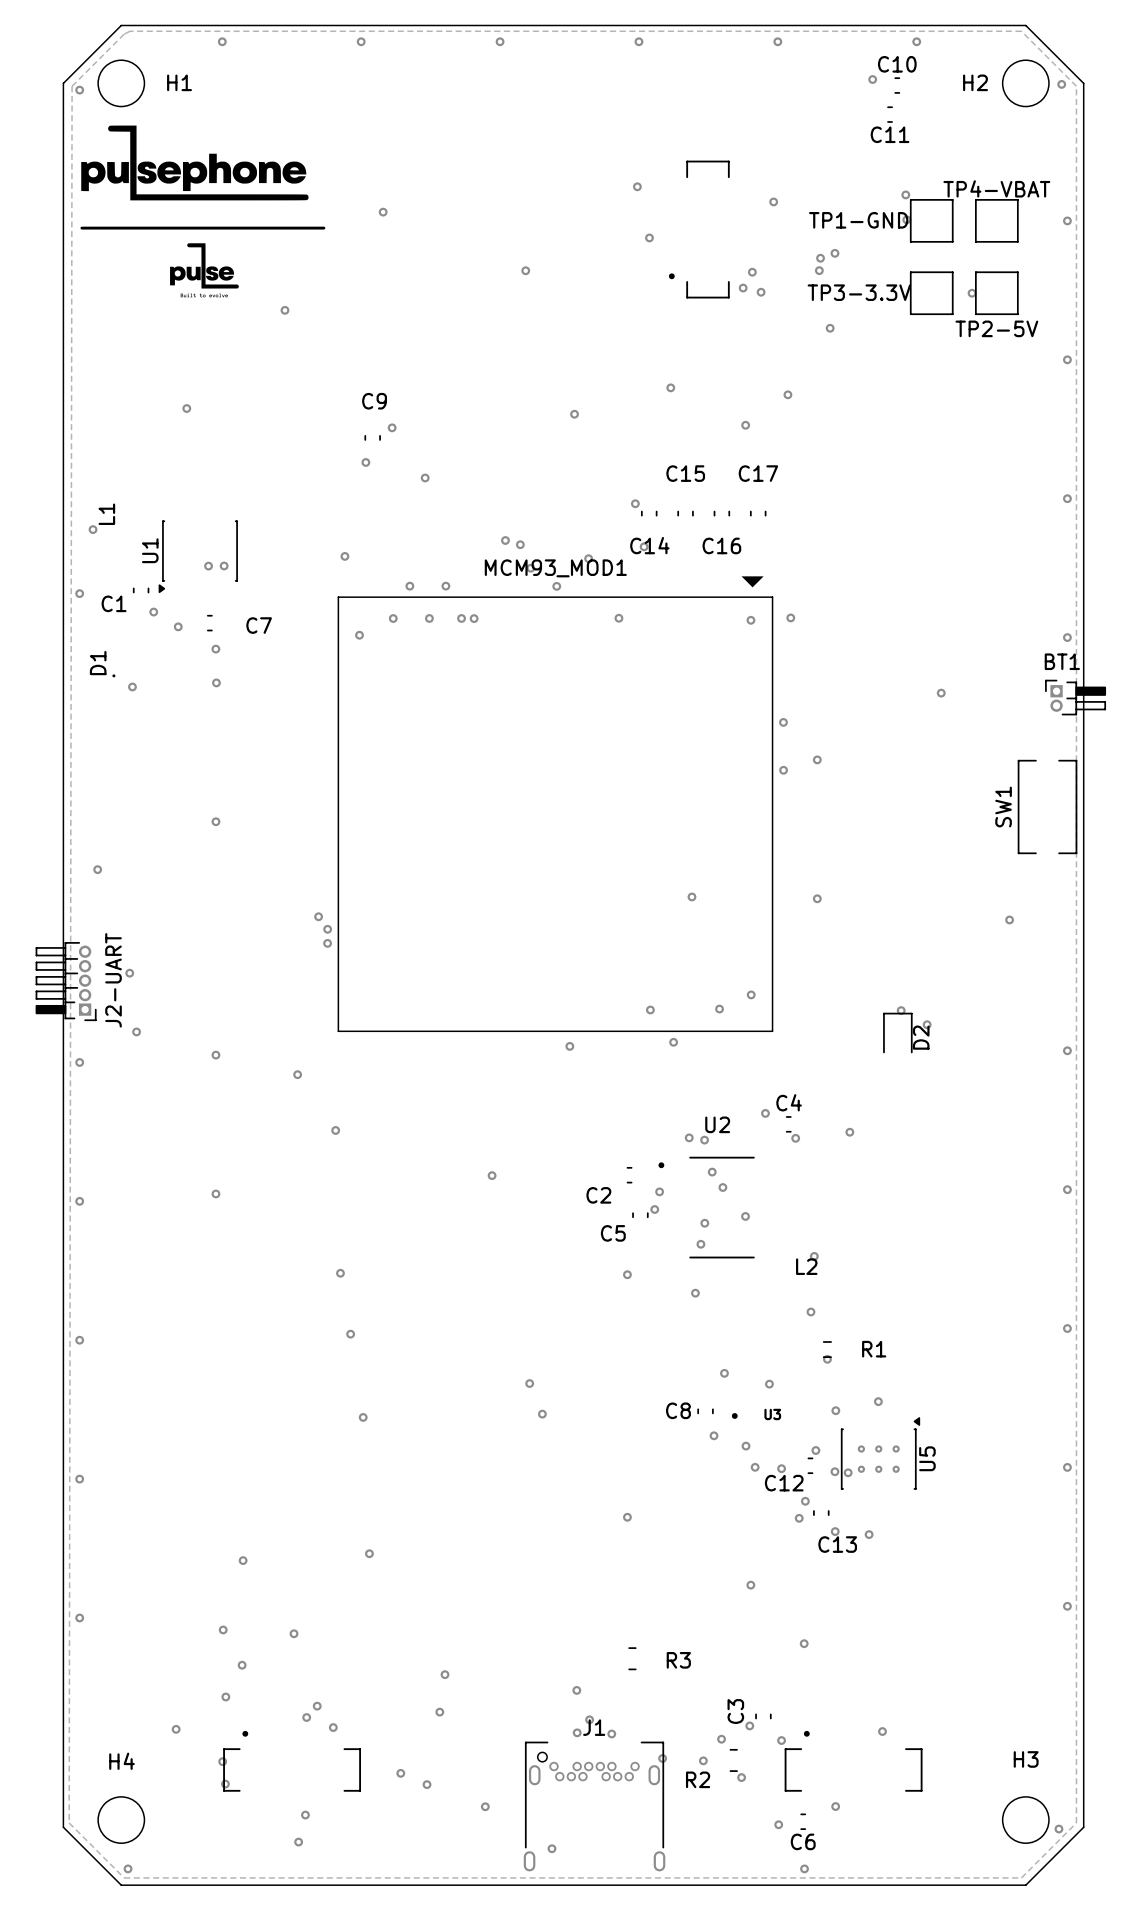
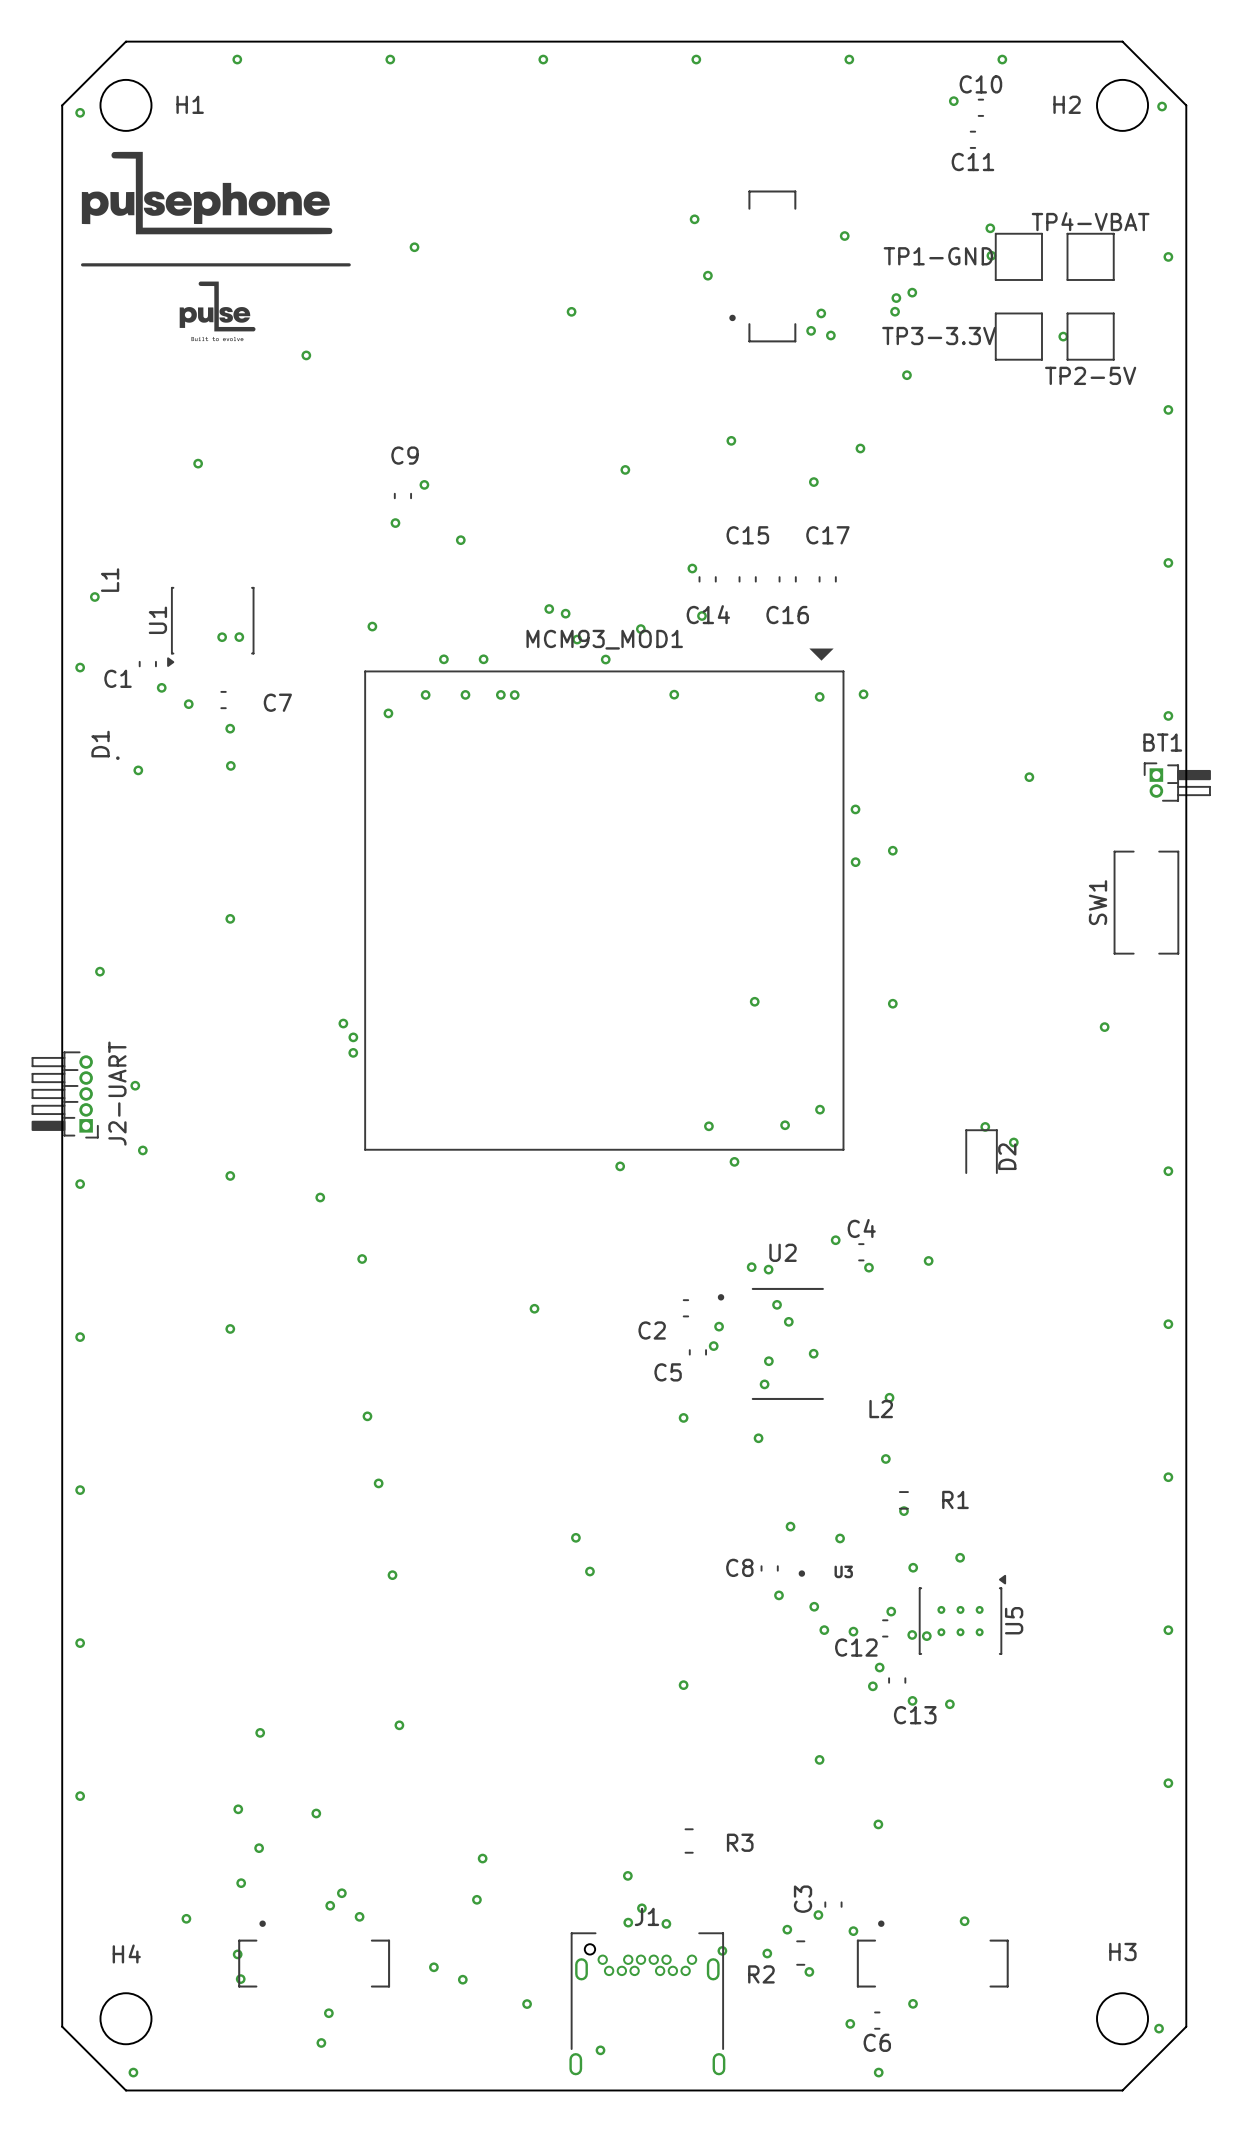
zone outline: (129, 31) (1021, 31) (1076, 86) (1076, 1822) (1021, 1877) (124, 1877) (69, 1822) (72, 86) (124, 34) (129, 31) -> none

